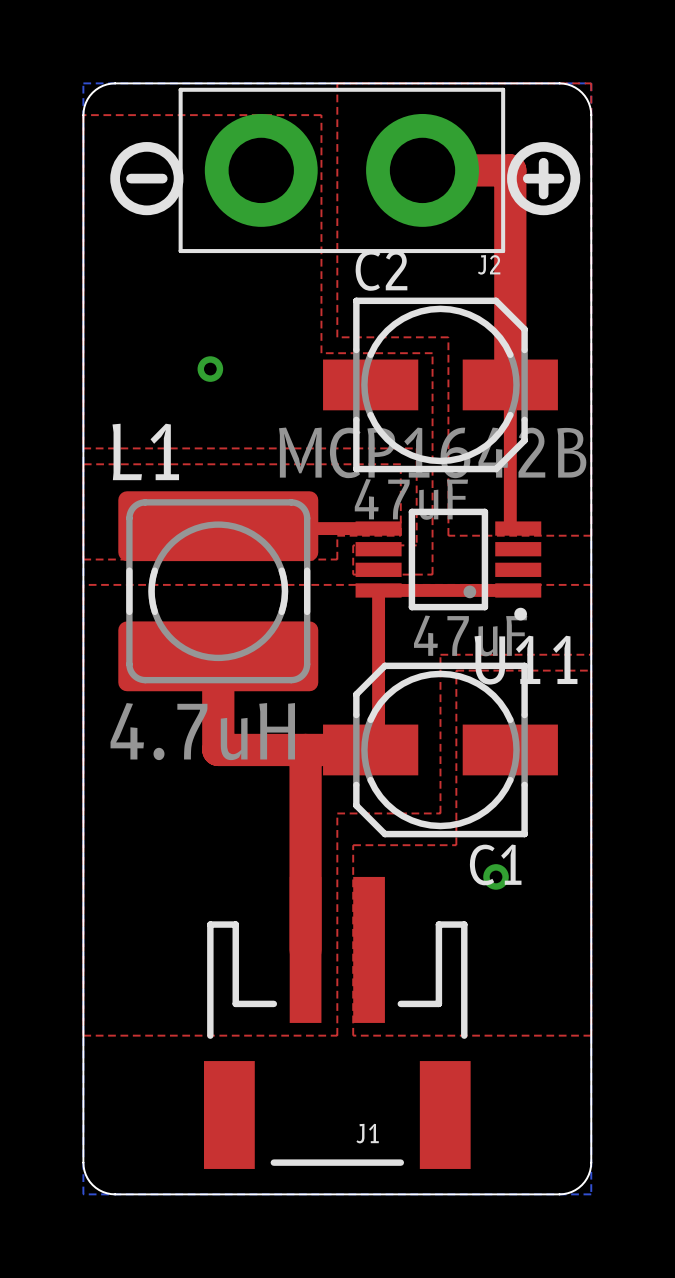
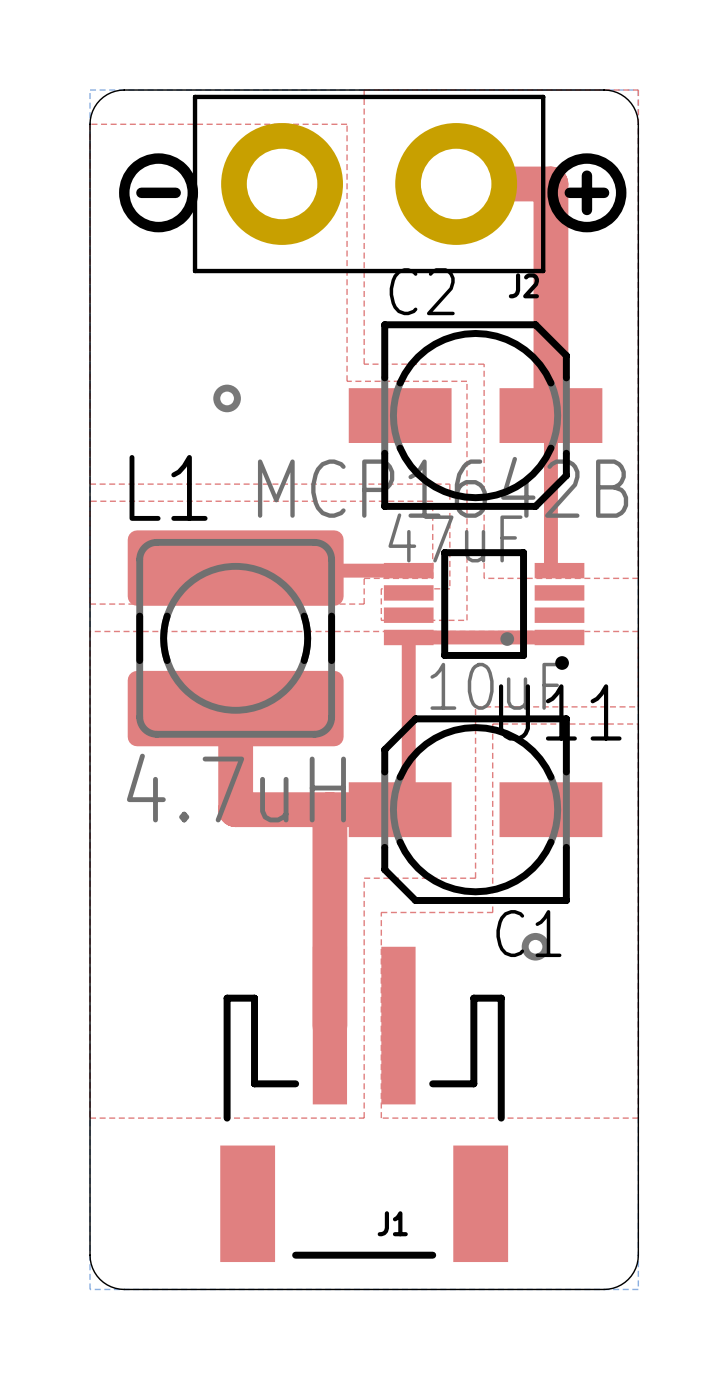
C1 value: 47uF (470, 635) -> 10uF (497, 686)

